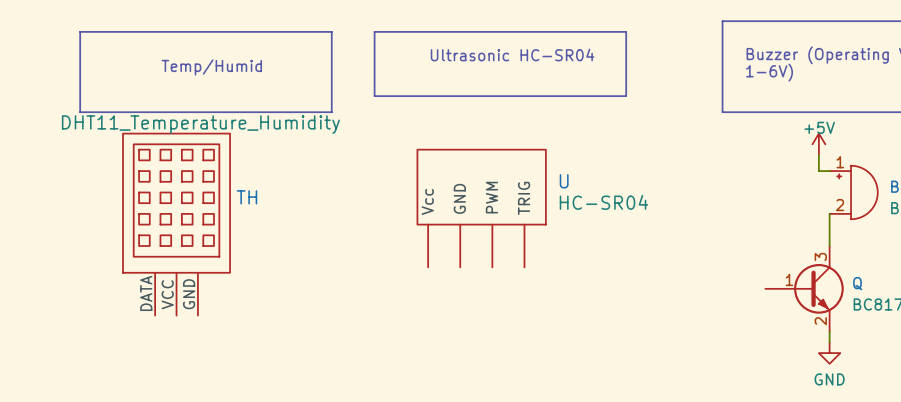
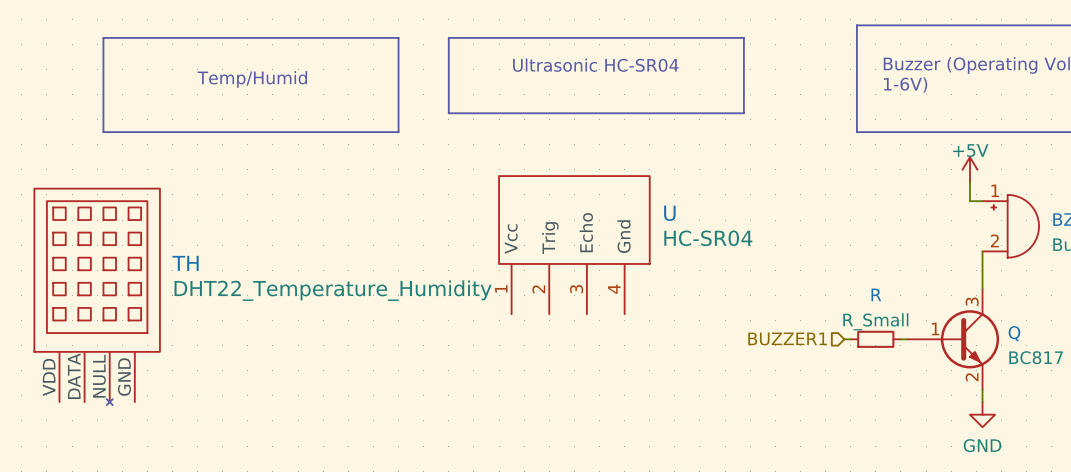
U pin name: PWM (491, 197) -> Echo (586, 232)
U pin name: GND (459, 198) -> Trig (550, 238)
U pin name: TRIG (524, 198) -> Gnd (624, 236)
TH: DHT11_Temperature_Humidity (176, 224) -> none
U pin number: none -> 4 (614, 289)
U pin number: none -> 1 (501, 288)
U pin number: none -> 2 (538, 289)
U pin number: none -> 3 (576, 289)
TH: none -> DHT22_Temperature_Humidity (97, 296)
hierarchical label: none -> BUZZER1 (787, 338)
wire: none -> (844, 339) (850, 339)
R: none -> R_Small (875, 339)
wire: none -> (900, 339) (907, 339)

